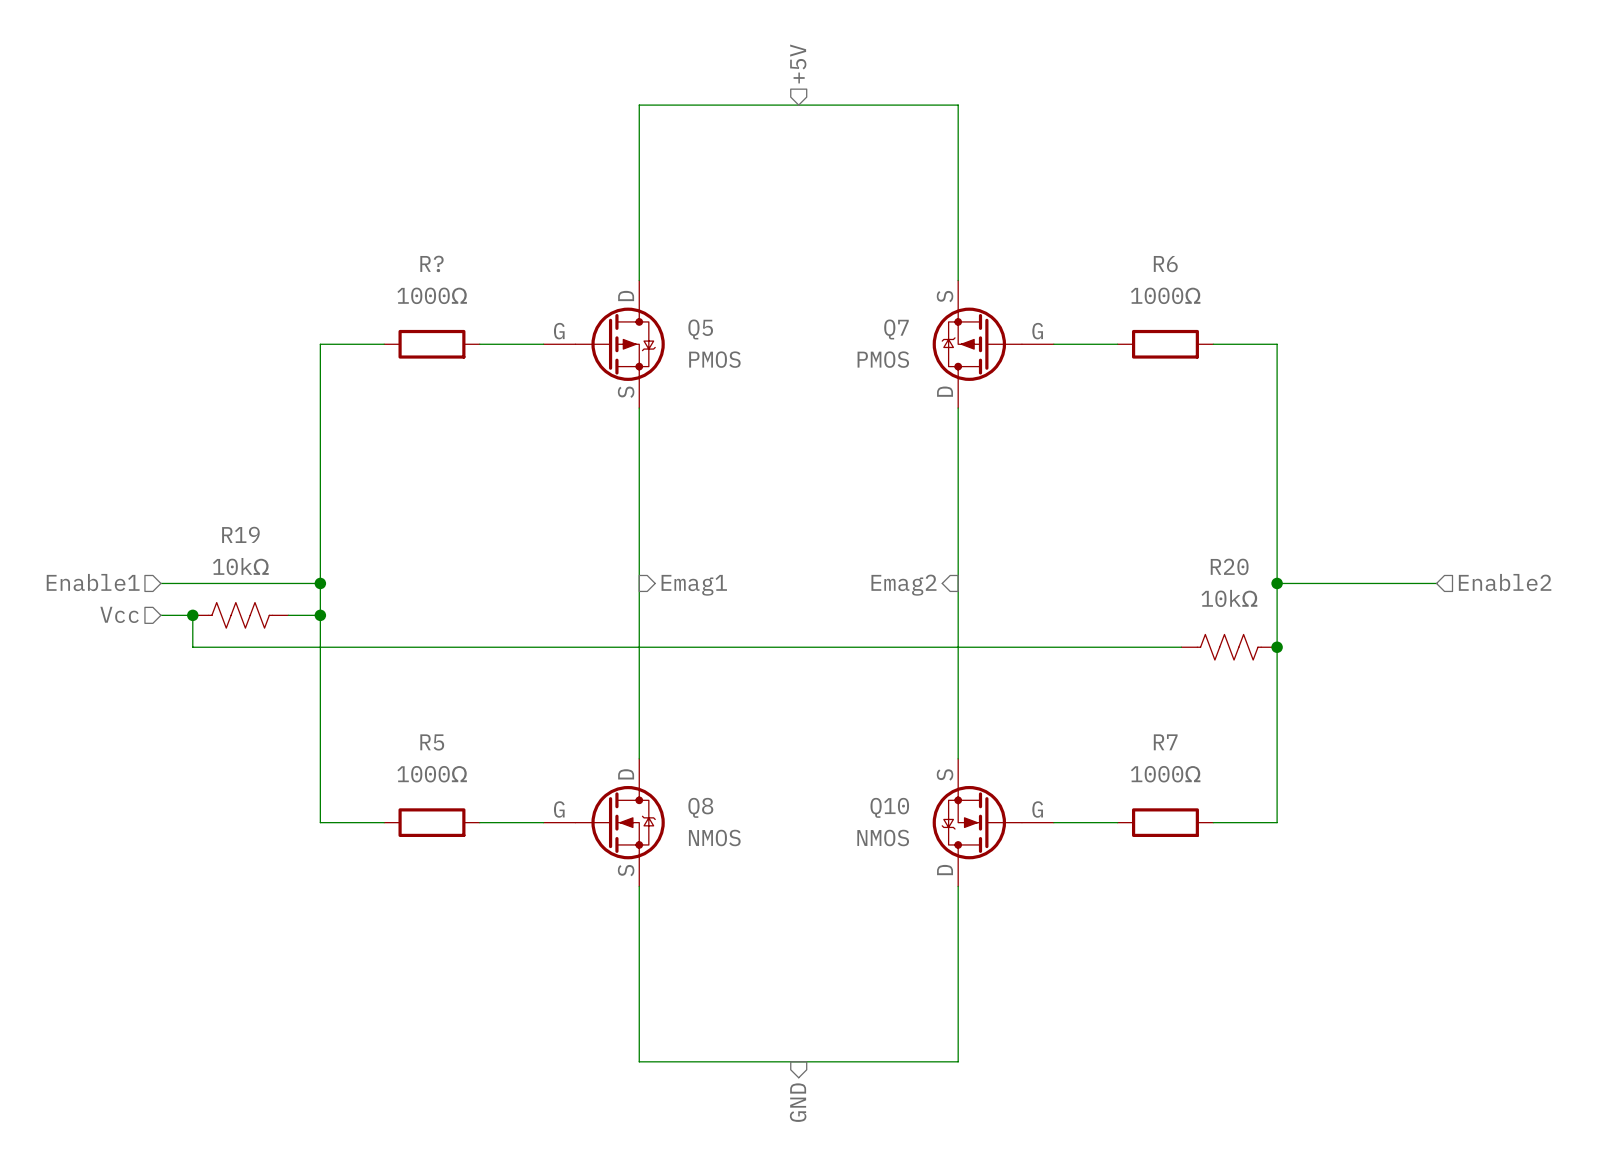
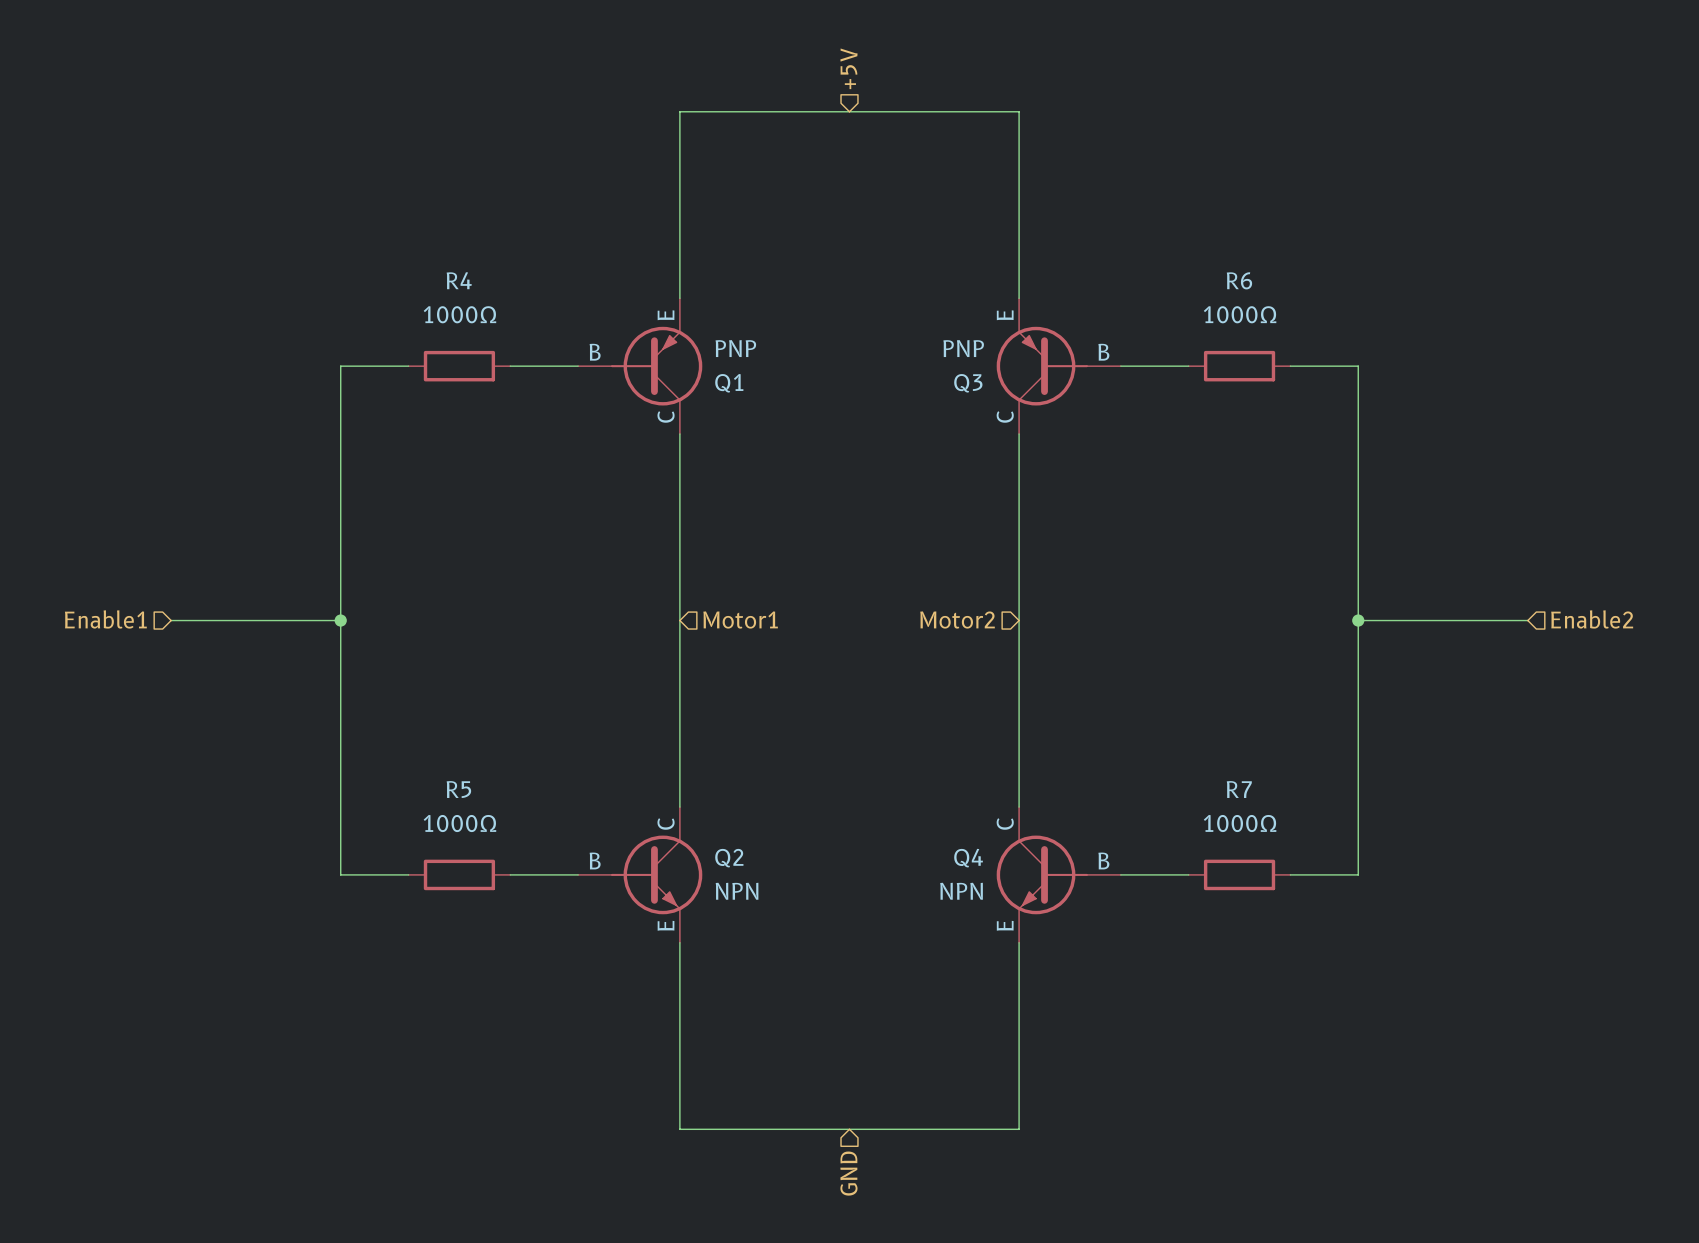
R? name: R? (431, 263) -> R4 (459, 280)
Q1: none -> PNP (640, 366)
Q5: PMOS (604, 344) -> none
Q7: PMOS (993, 344) -> none
Q3: none -> PNP (1058, 366)
hierarchical label shape: output (694, 585) -> input (740, 620)
hierarchical label: Emag1 (694, 585) -> Motor1 (740, 620)
hierarchical label shape: output (903, 585) -> input (957, 620)
hierarchical label: Emag2 (903, 585) -> Motor2 (957, 620)
hierarchical label: Vcc (119, 614) -> none
wire: (160, 615) (192, 615) (192, 647) (1181, 647) -> none
junction: (192, 615) -> none
R19: 10kΩ (240, 615) -> none
wire: (288, 615) (320, 615) -> none
junction: (320, 615) -> none
R20: 10kΩ (1229, 647) -> none
junction: (1277, 647) -> none
Q2: none -> NPN (640, 874)
Q8: NMOS (604, 822) -> none
Q10: NMOS (993, 822) -> none
Q4: none -> NPN (1058, 874)
hierarchical label shape: output (798, 1102) -> input (848, 1173)

